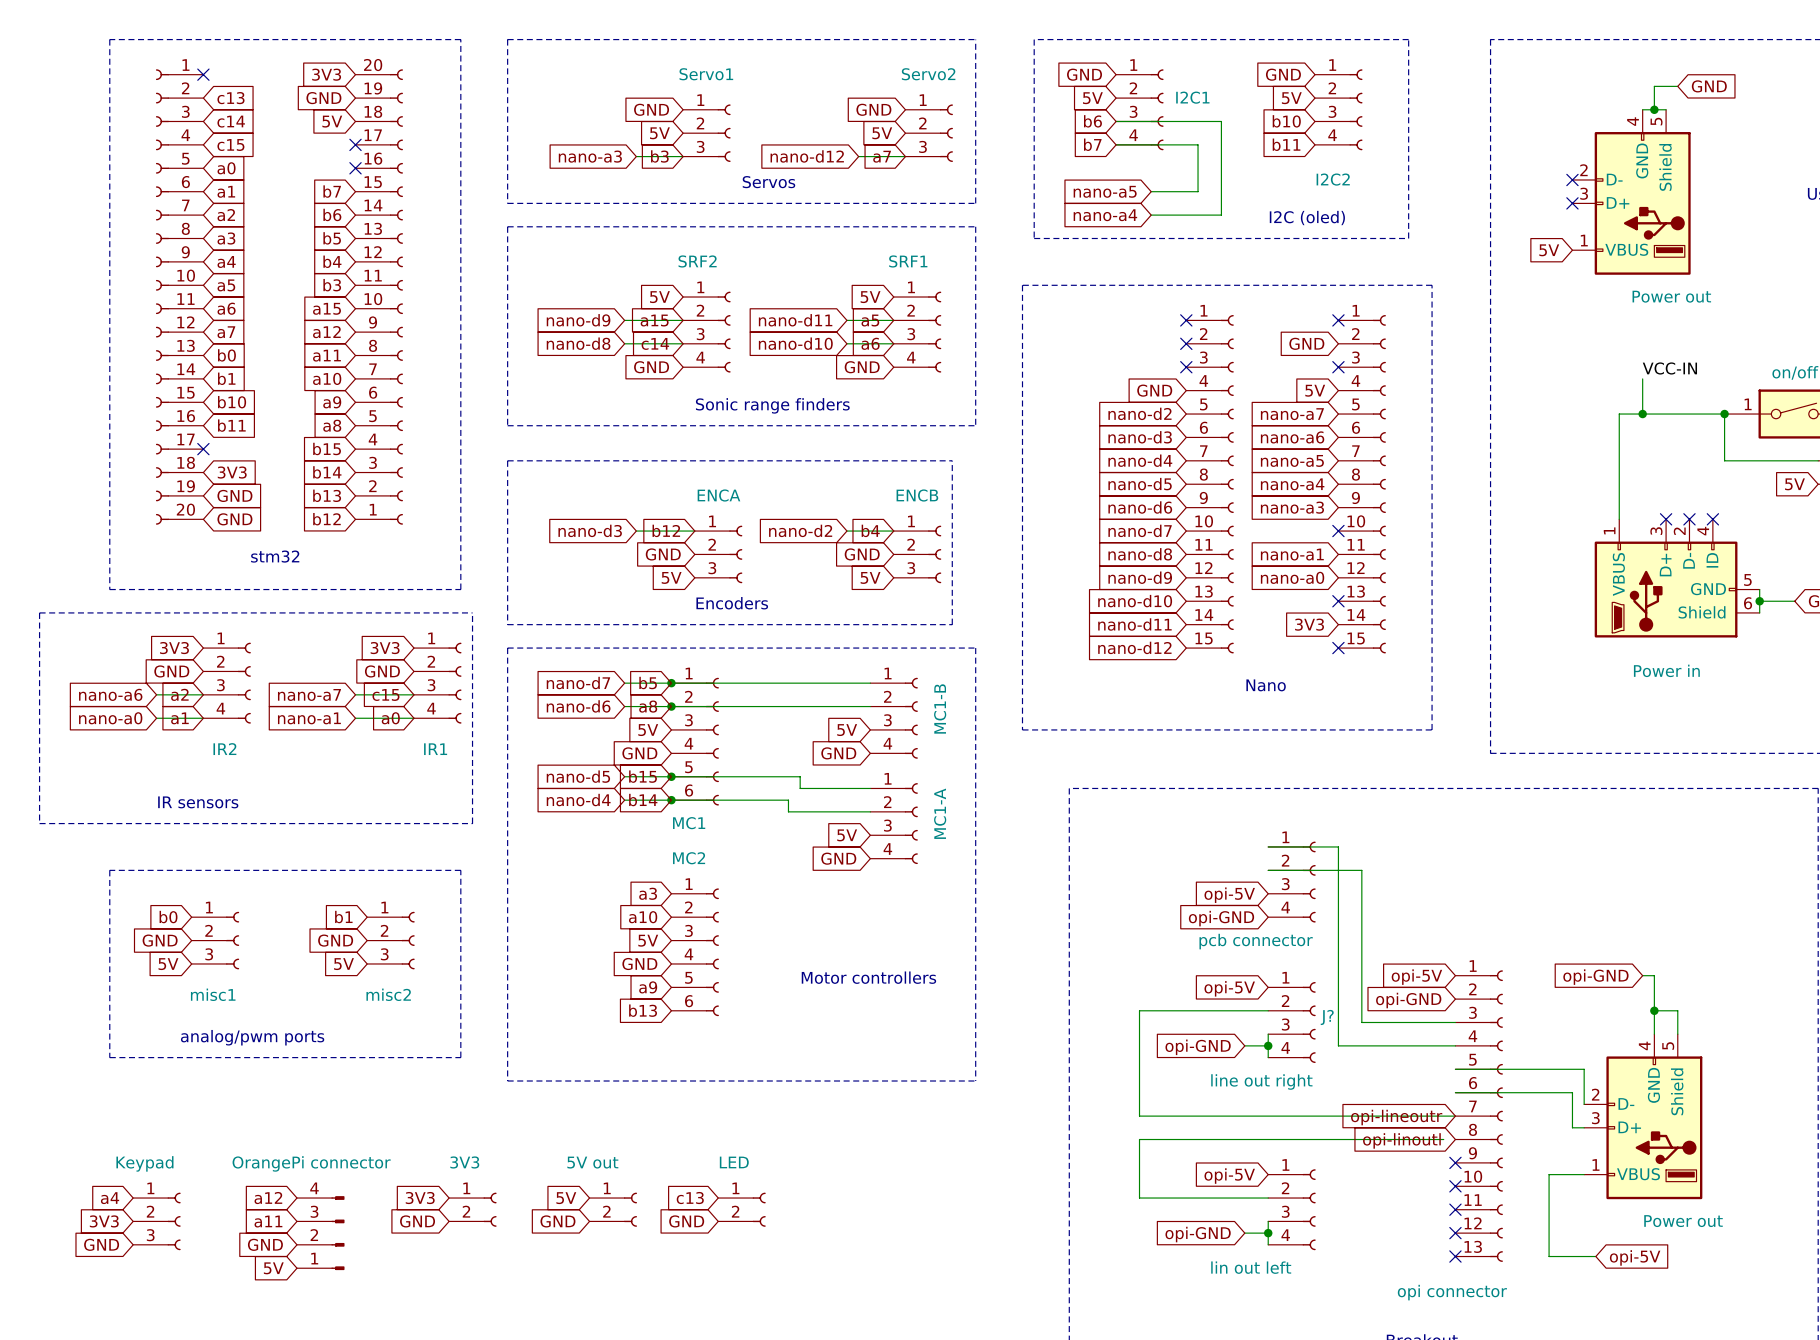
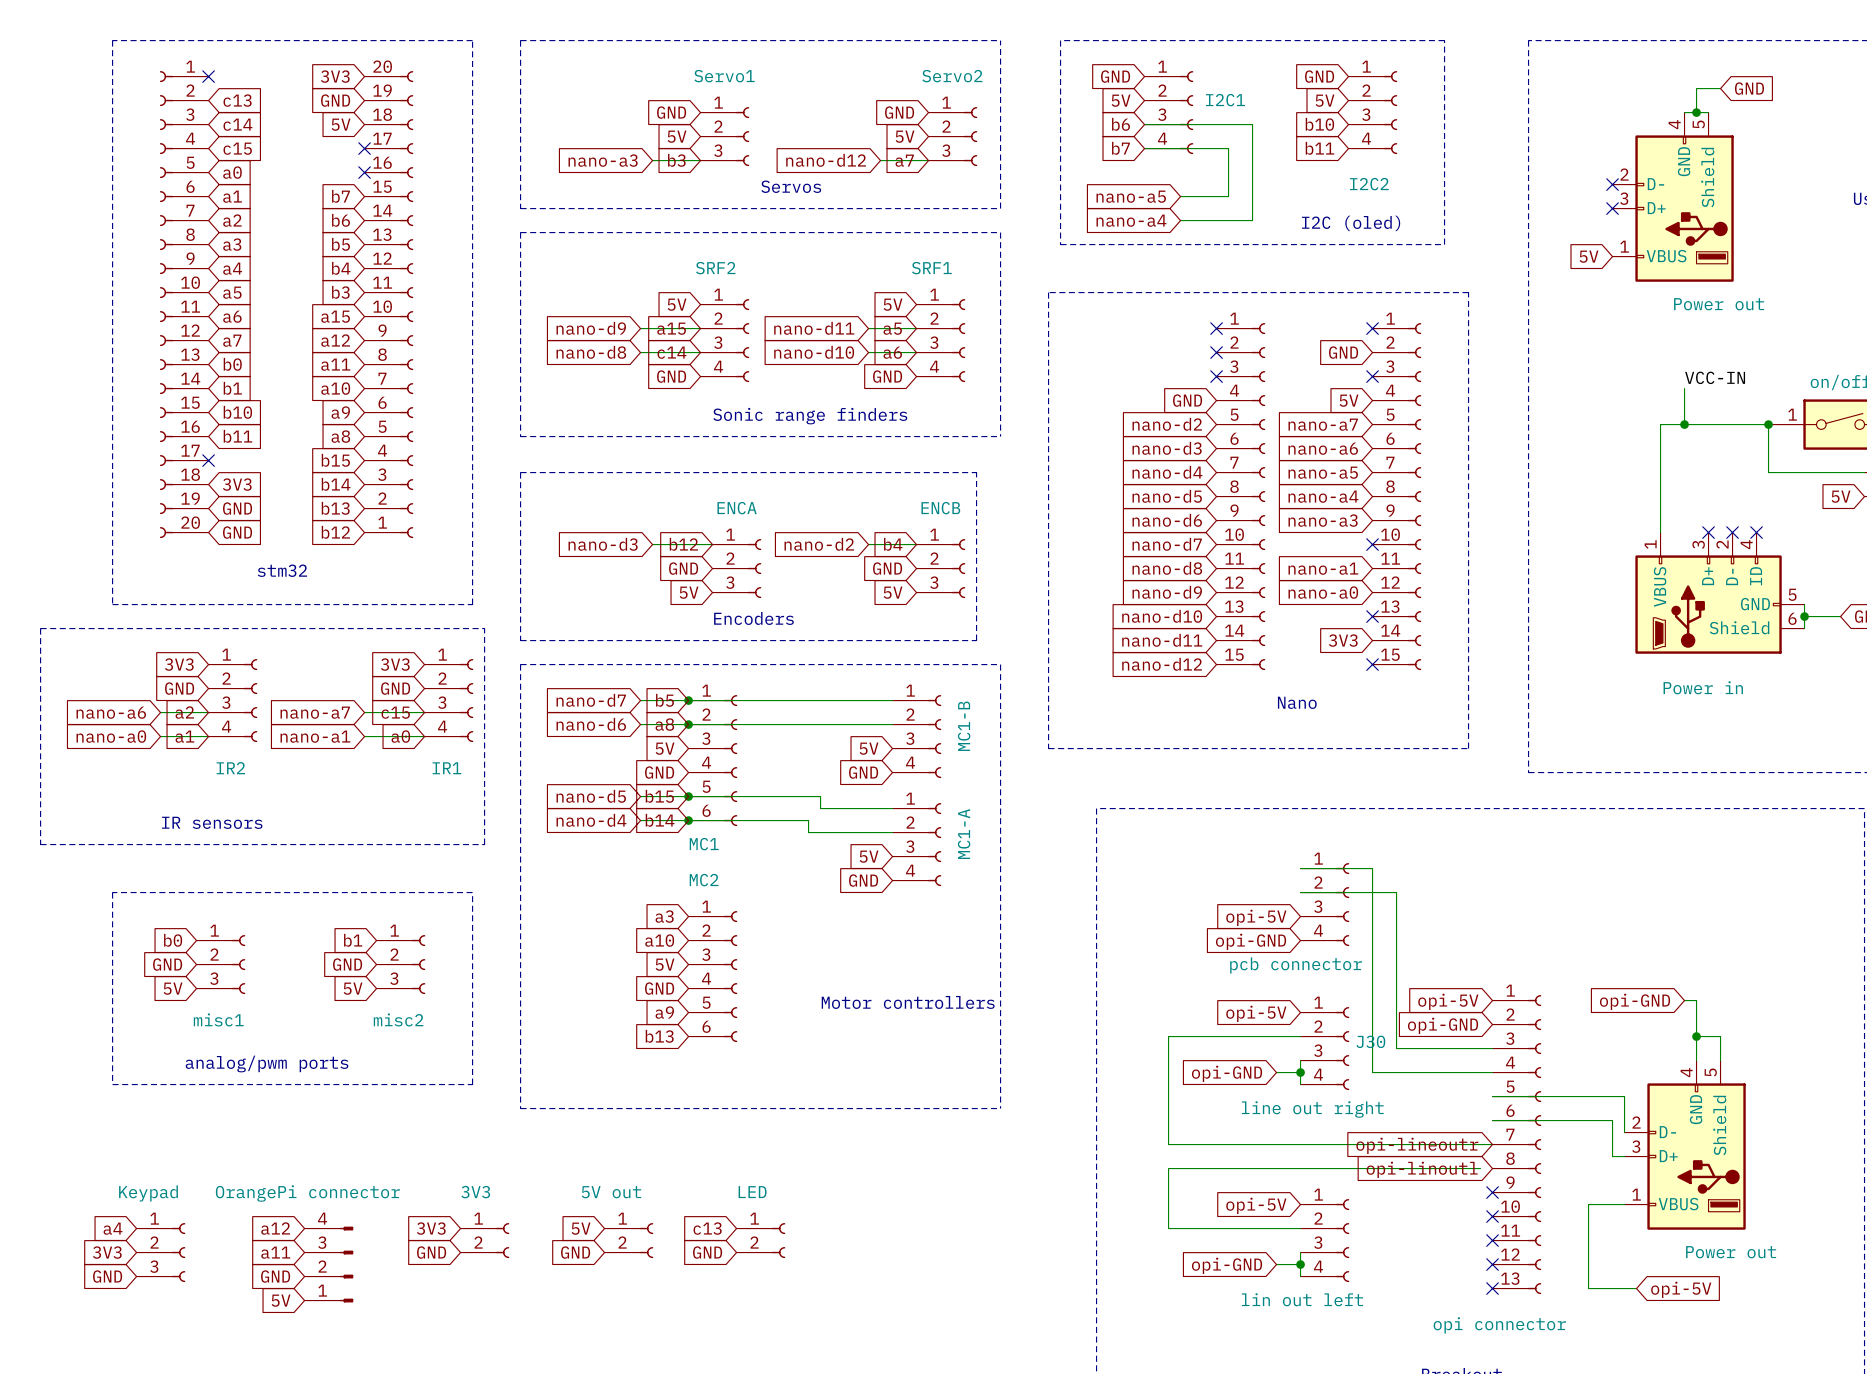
J? name: J? (1327, 1017) -> J30 (1370, 1041)

